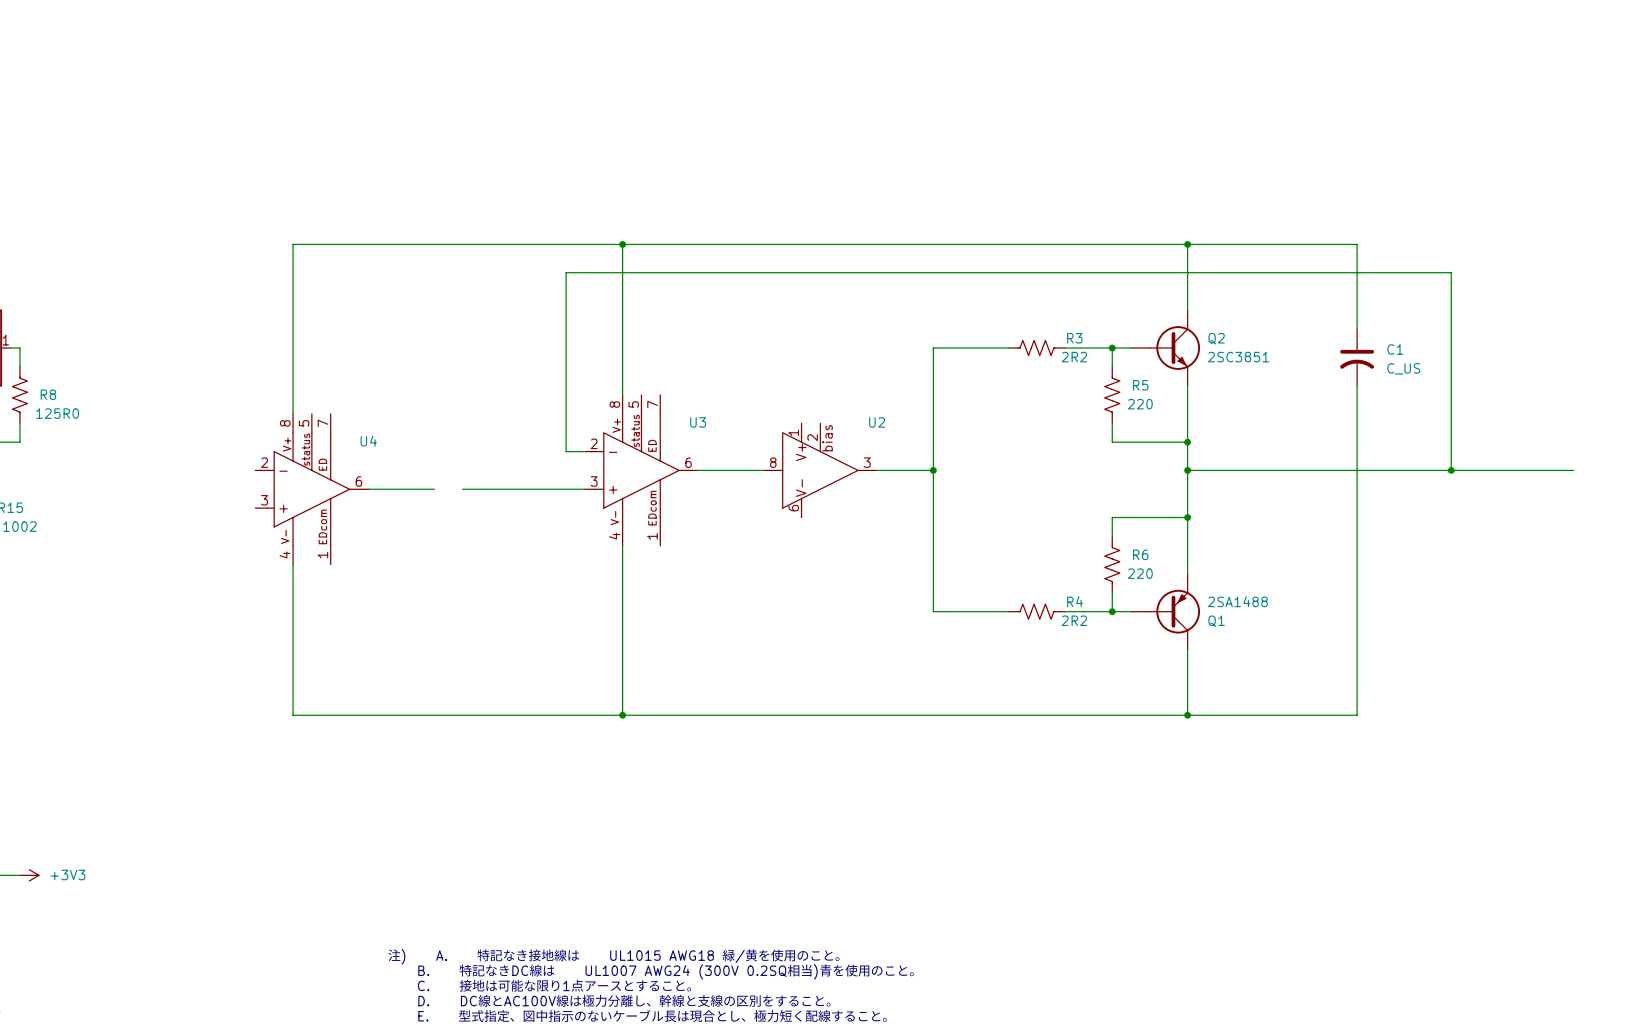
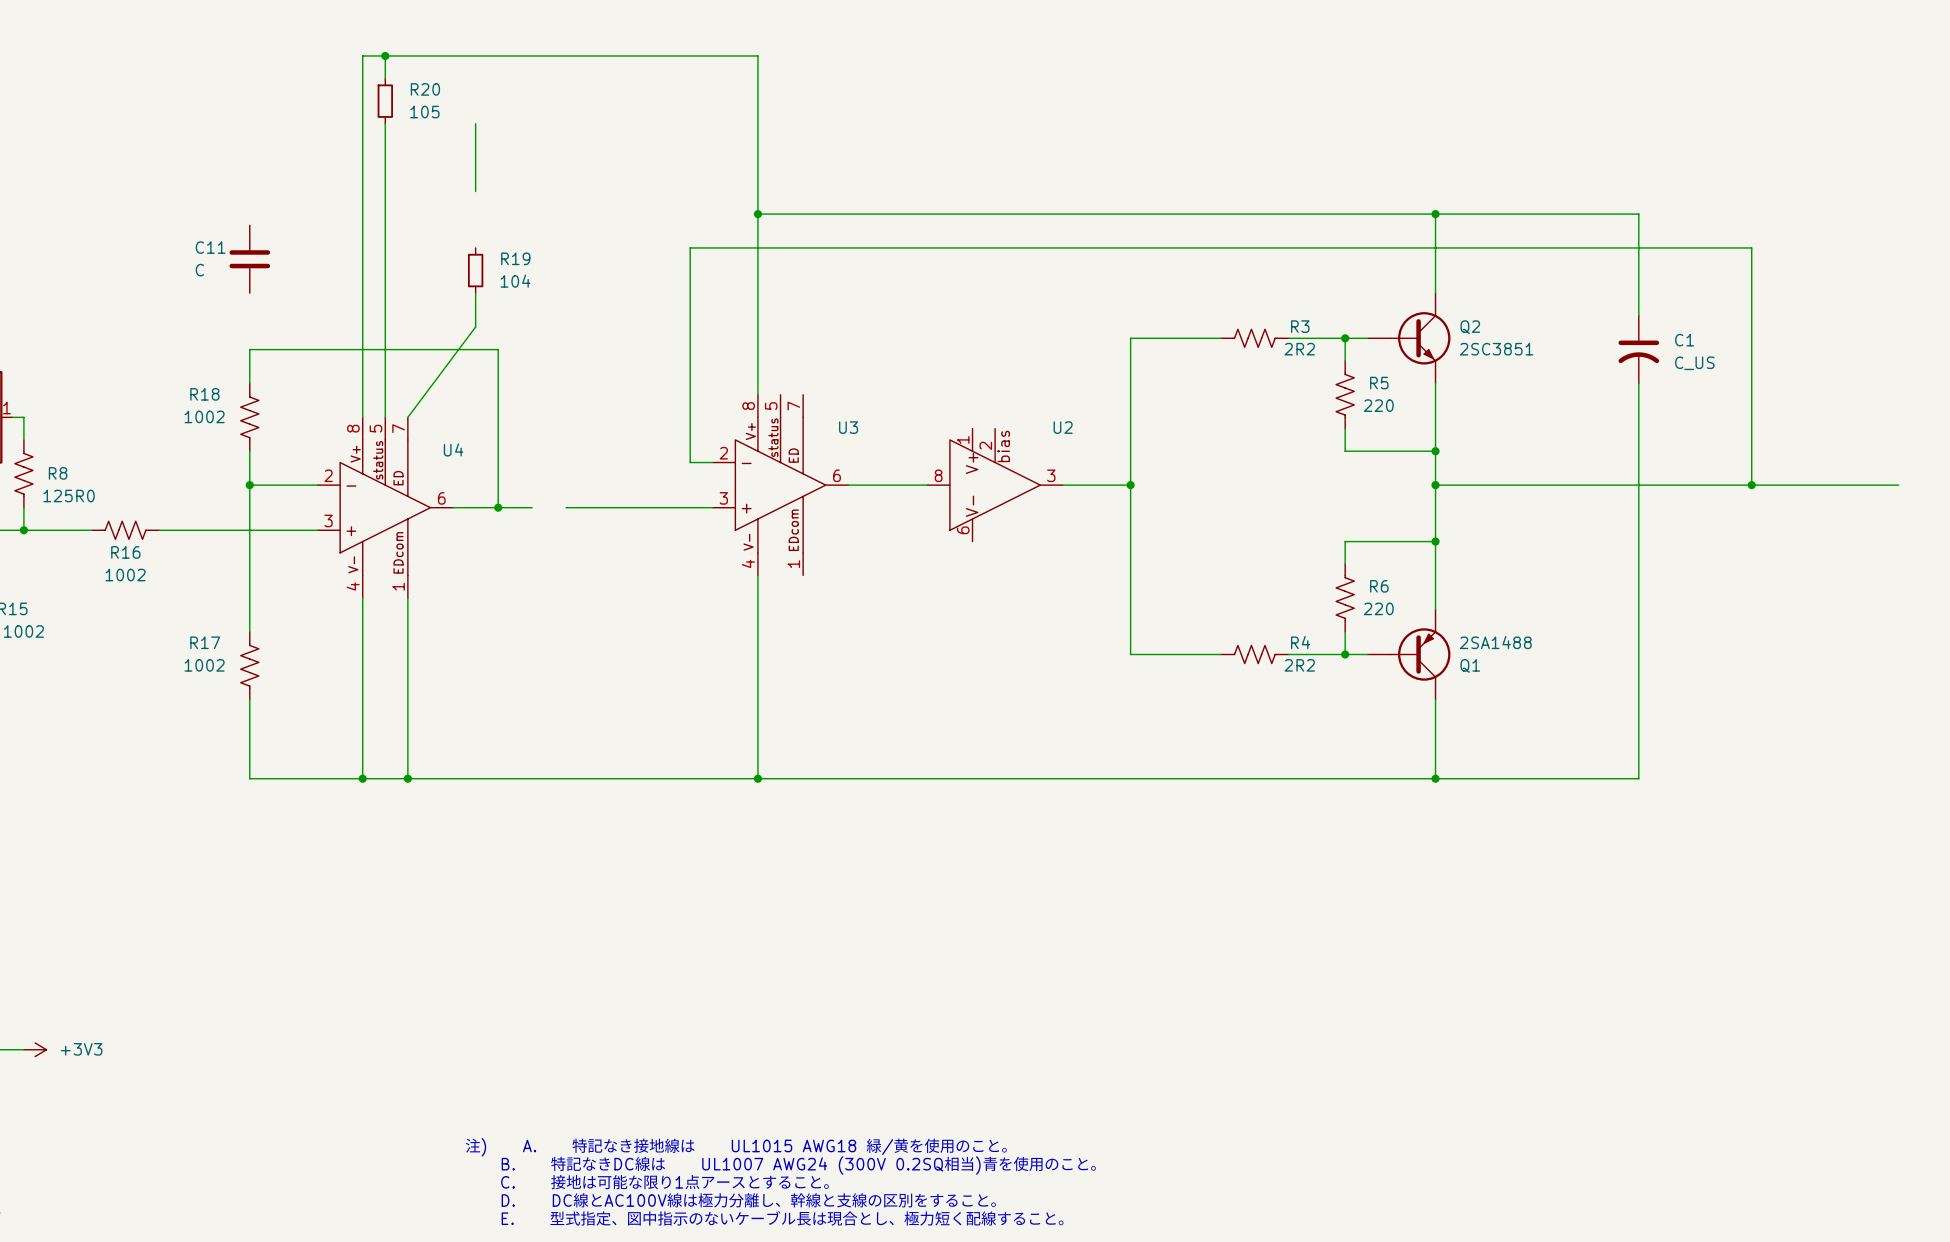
wire: none -> (385, 55) (385, 78)
junction: none -> (385, 55)
R20: none -> 105 (385, 101)
wire: none -> (385, 123) (385, 417)
wire: none -> (475, 123) (475, 191)
wire: none -> (757, 214) (1638, 214) (1638, 315)
junction: none -> (757, 214)
junction: none -> (1435, 214)
C11: none -> C (249, 259)
R19: none -> 104 (475, 270)
wire: none -> (475, 293) (475, 327) (407, 417)
wire: (622, 244) (622, 395) -> none
junction: (622, 244) -> none
wire: (1187, 244) (1187, 310) -> (1435, 214) (1435, 293)
junction: (1187, 244) -> none
junction: none -> (1345, 338)
wire: none -> (249, 383) (249, 349) (498, 349) (498, 507)
wire: none -> (1638, 383) (1638, 778) (249, 778) (249, 699)
wire: none -> (757, 394) (757, 55) (362, 55) (362, 417)
wire: (1357, 329) (1357, 244) (293, 244) (293, 413) -> none
R18: none -> 1002 (249, 417)
wire: (1008, 348) (933, 348) (933, 611) (1008, 611) -> (1220, 338) (1130, 338) (1130, 654) (1220, 654)
R3 position: (1036, 348) -> (1254, 338)
wire: (1065, 348) (1131, 348) -> (1288, 338) (1367, 338)
wire: (1112, 348) (1112, 366) -> (1345, 338) (1345, 360)
junction: (1112, 348) -> none
Q2 position: (1165, 348) -> (1409, 338)
C1 position: (1357, 357) -> (1638, 349)
wire: none -> (249, 451) (249, 631)
junction: none -> (1435, 451)
wire: (1187, 385) (1187, 574) -> (1435, 383) (1435, 609)
wire: (1357, 385) (1357, 715) (293, 715) (293, 564) -> none
R5 position: (1112, 395) -> (1345, 394)
wire: none -> (249, 485) (317, 485)
junction: none -> (249, 485)
junction: none -> (1130, 485)
junction: none -> (1435, 485)
junction: none -> (1751, 485)
junction: none -> (498, 507)
wire: (1112, 423) (1112, 442) (1187, 442) -> (1345, 428) (1345, 451) (1435, 451)
wire: none -> (23, 530) (91, 530)
junction: none -> (23, 530)
R16: none -> 1002 (125, 530)
wire: none -> (159, 530) (317, 530)
junction: (1187, 442) -> none
wire: (584, 451) (566, 451) (566, 272) (1451, 272) (1451, 470) -> (712, 462) (690, 462) (690, 247) (1751, 247) (1751, 485)
junction: none -> (1435, 541)
U3 position: (641, 470) -> (780, 485)
wire: (697, 470) (763, 470) -> (848, 485) (927, 485)
U2 position: (820, 470) -> (995, 485)
wire: (876, 470) (933, 470) -> (1062, 485) (1130, 485)
junction: (933, 470) -> none
wire: (1187, 470) (1573, 470) -> (1435, 485) (1898, 485)
junction: (1187, 470) -> none
junction: (1451, 470) -> none
U4 position: (311, 489) -> (385, 507)
wire: (368, 489) (434, 489) -> (453, 507) (532, 507)
wire: (462, 489) (584, 489) -> (565, 507) (712, 507)
wire: none -> (362, 598) (362, 778)
wire: none -> (407, 598) (407, 778)
wire: (1187, 517) (1112, 517) (1112, 536) -> (1435, 541) (1345, 541) (1345, 564)
junction: (1187, 517) -> none
wire: (622, 545) (622, 715) -> (757, 575) (757, 778)
junction: none -> (1345, 654)
R17: none -> 1002 (249, 665)
R6 position: (1112, 564) -> (1345, 598)
wire: (1112, 592) (1112, 611) -> (1345, 631) (1345, 654)
R4 position: (1036, 611) -> (1254, 654)
wire: (1065, 611) (1131, 611) -> (1288, 654) (1367, 654)
junction: (1112, 611) -> none
Q1 position: (1165, 611) -> (1409, 654)
junction: none -> (362, 778)
junction: none -> (407, 778)
junction: none -> (757, 778)
wire: (1187, 649) (1187, 715) -> (1435, 699) (1435, 778)
junction: none -> (1435, 778)
junction: (622, 715) -> none
junction: (1187, 715) -> none

